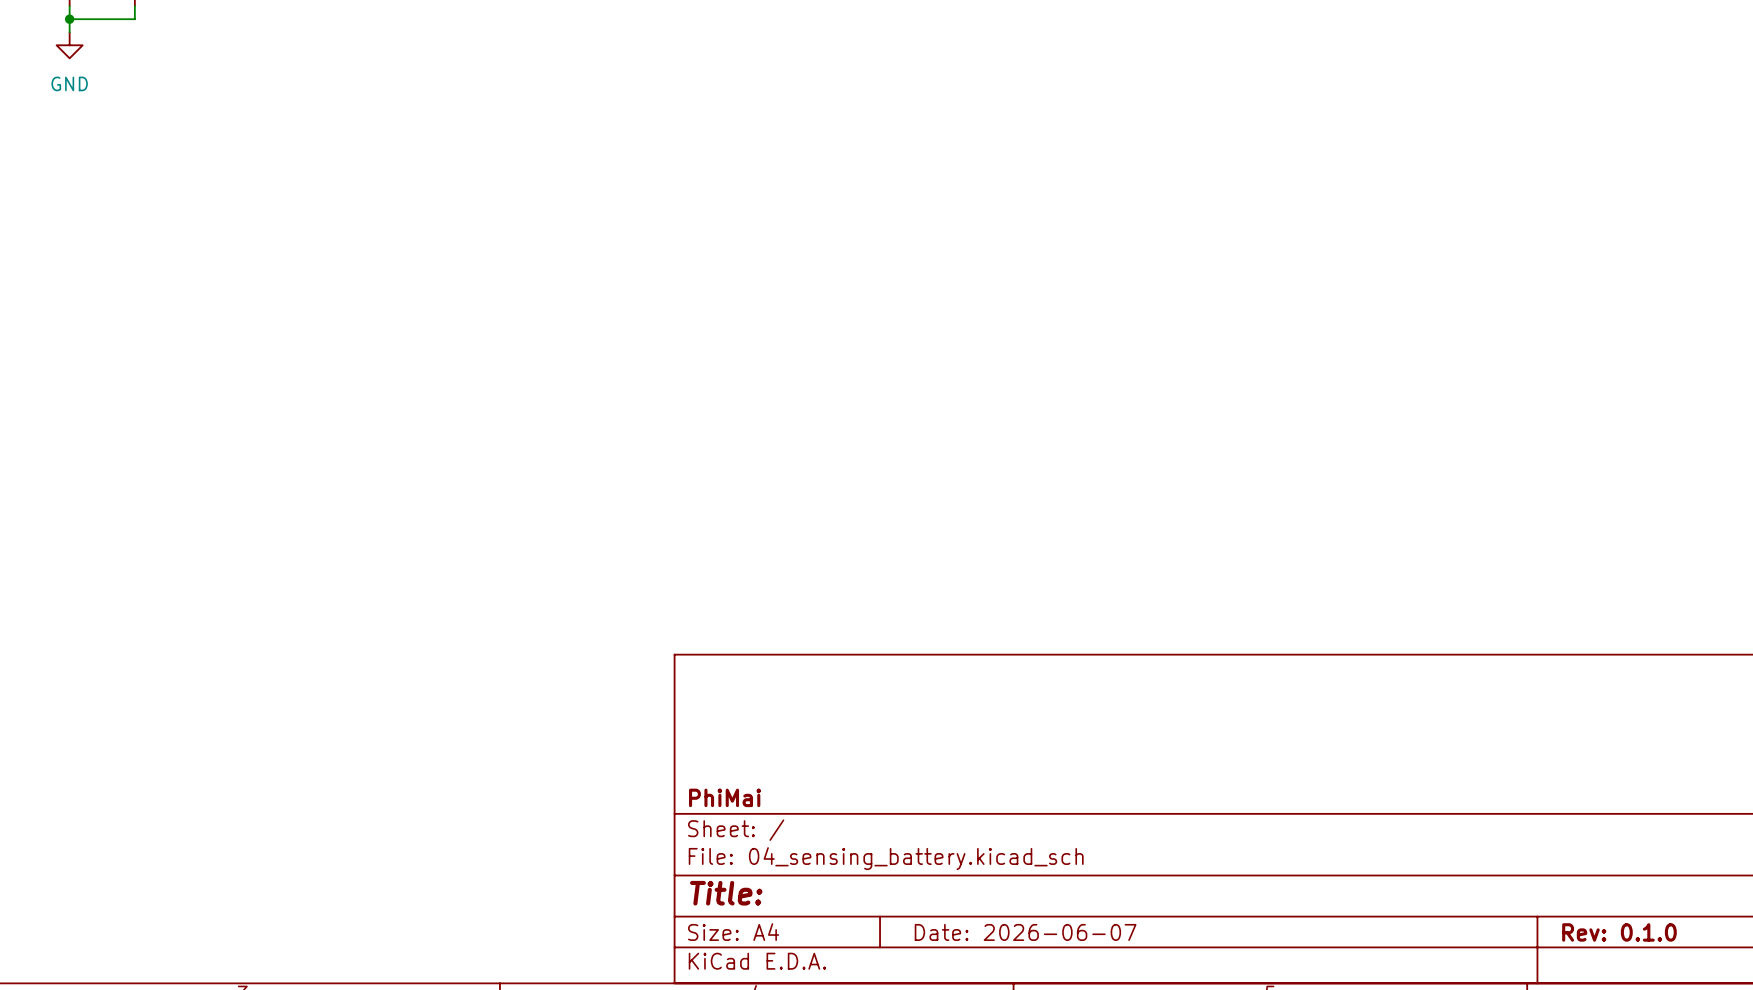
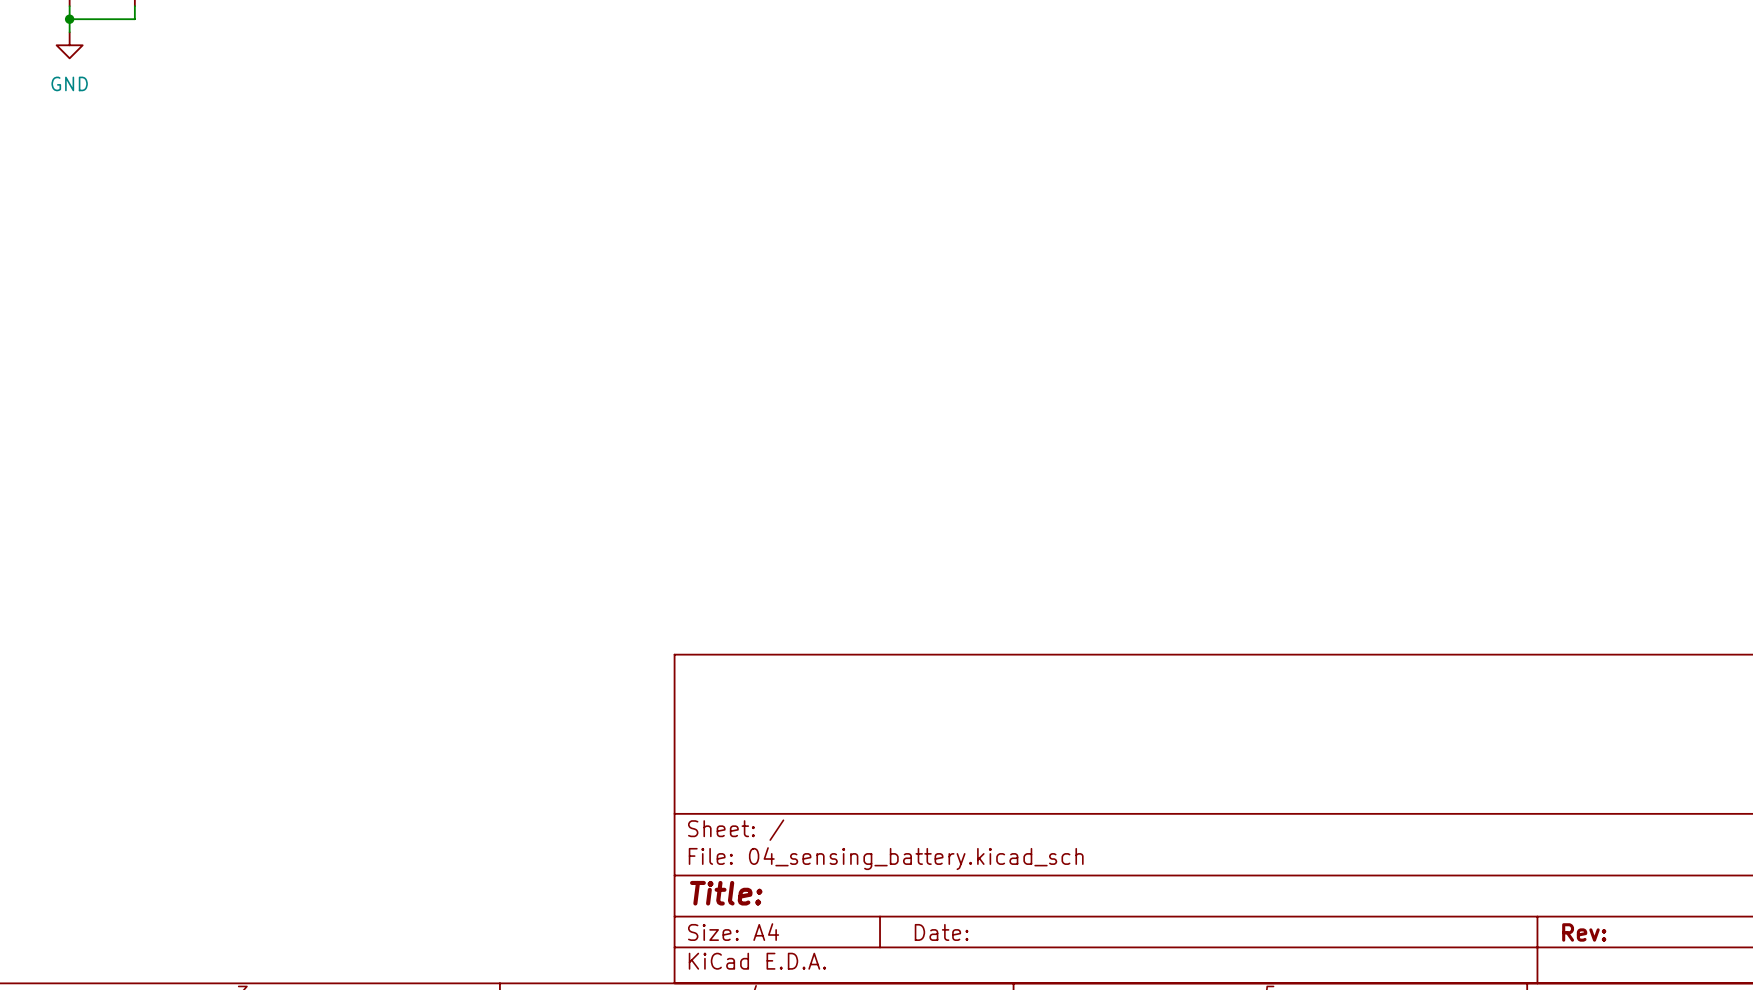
title block: PhiMai (725, 797) -> none
title block: Date: 2026-06-07 (1025, 932) -> Date: (941, 932)
title block: Rev: 0.1.0 (1619, 932) -> Rev: (1584, 932)

